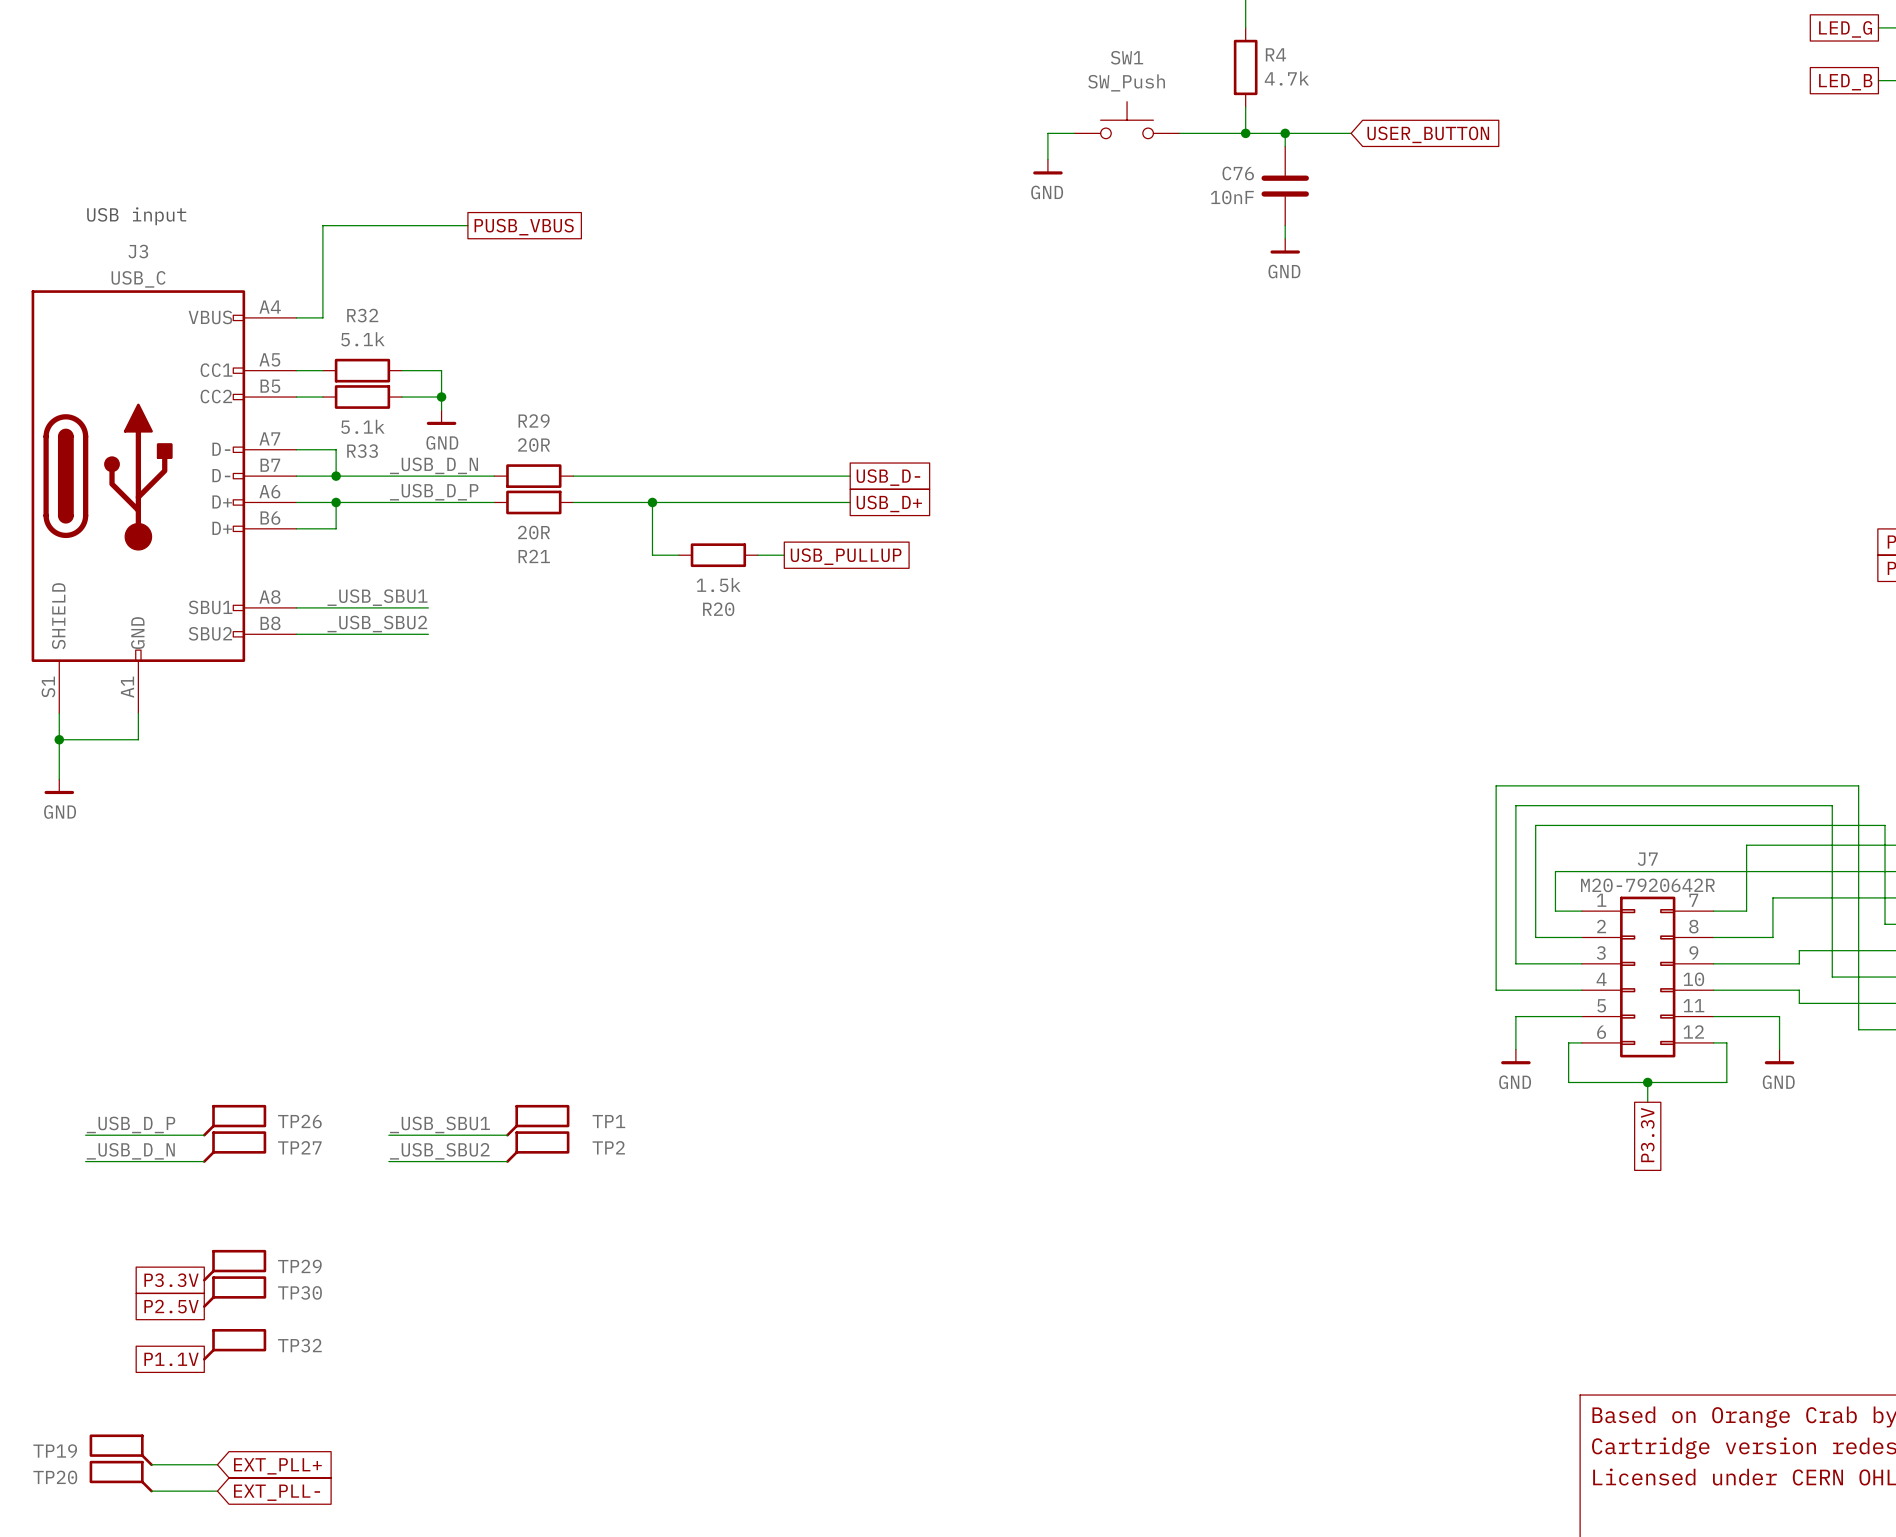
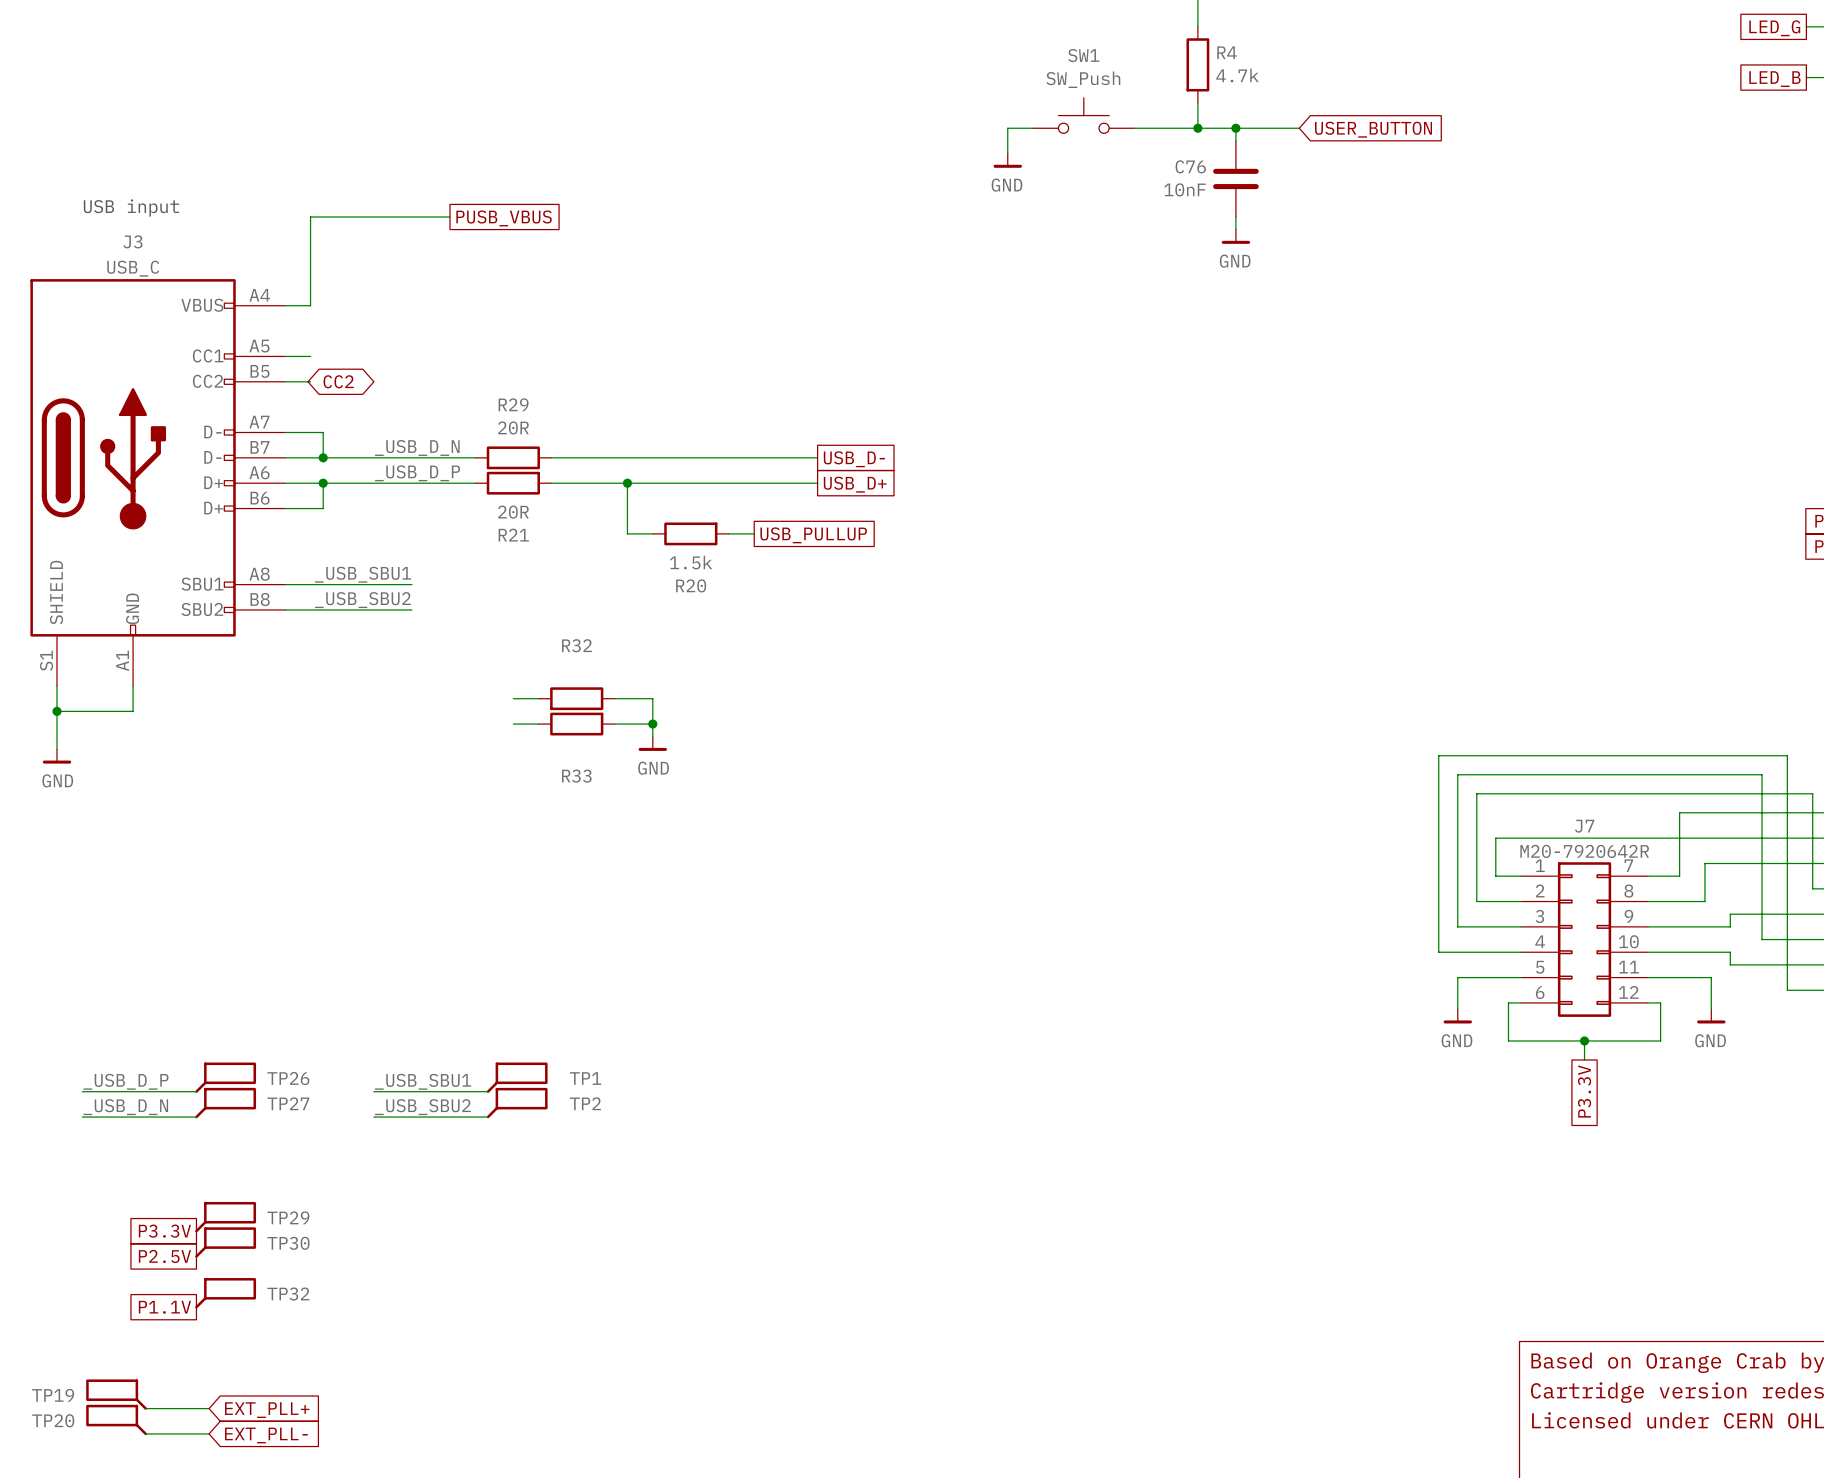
R32 value: 5.1k (362, 339) -> none
R32 position: (362, 370) -> (576, 698)
wire: (402, 370) (441, 370) (441, 410) -> none
global label: none -> CC2 (338, 381)
R33 position: (362, 397) -> (576, 724)
wire: (402, 397) (441, 397) -> none
junction: (441, 397) -> none
power symbol: GND (441, 417) -> none
R33 value: 5.1k (362, 426) -> none
wire: none -> (513, 698) (538, 698)
wire: none -> (614, 698) (652, 698) (652, 736)
wire: none -> (513, 724) (538, 724)
wire: none -> (614, 724) (652, 724)
junction: none -> (652, 724)
power symbol: none -> GND (652, 743)

